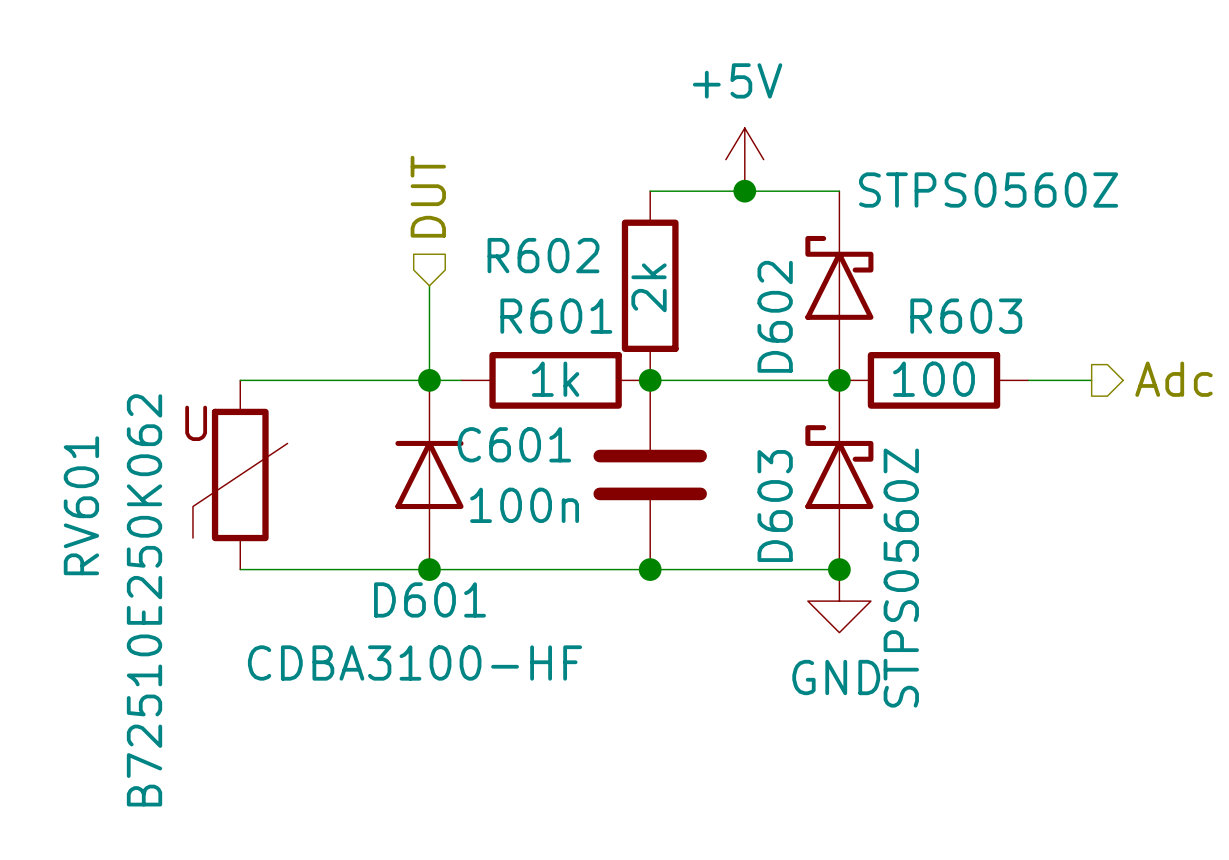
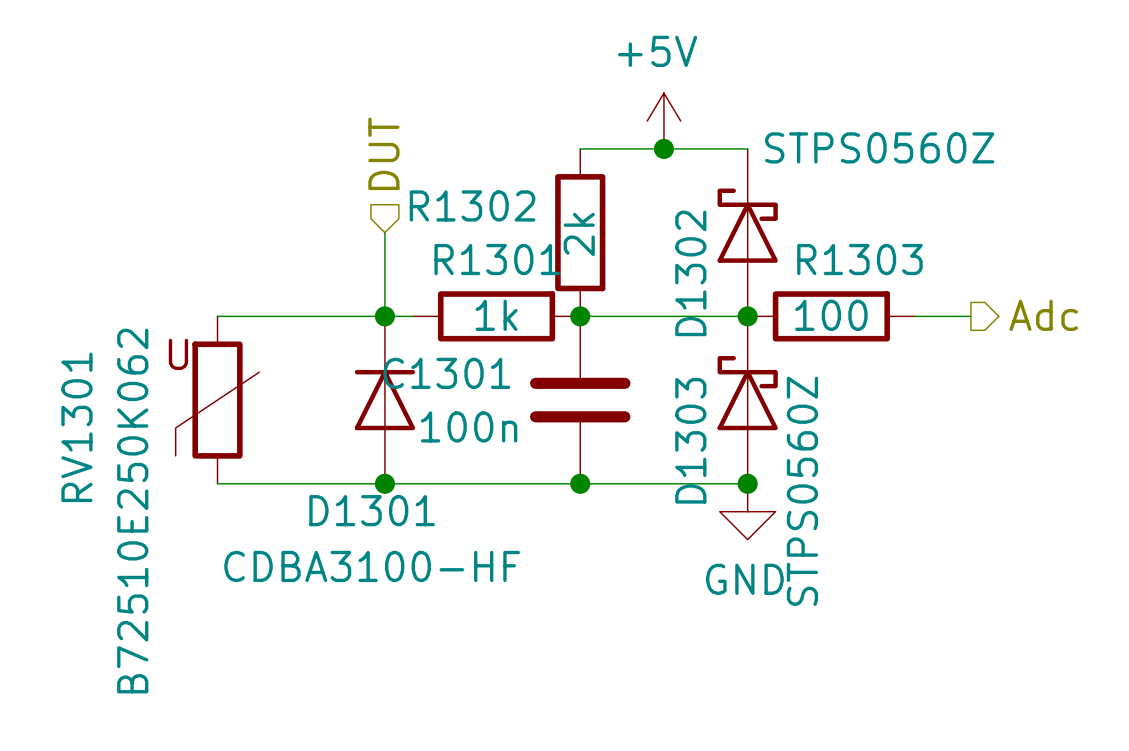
R602 name: R602 (543, 255) -> R1302 (472, 205)
R601 name: R601 (556, 316) -> R1301 (497, 259)
D602 name: D602 (775, 316) -> D1302 (690, 273)
R603 name: R603 (966, 316) -> R1303 (859, 259)
C601 name: C601 (514, 444) -> C1301 (446, 373)
RV601 name: RV601 (81, 505) -> RV1301 (76, 427)
D603 name: D603 (775, 506) -> D1303 (690, 440)
D601 name: D601 (429, 599) -> D1301 (372, 510)

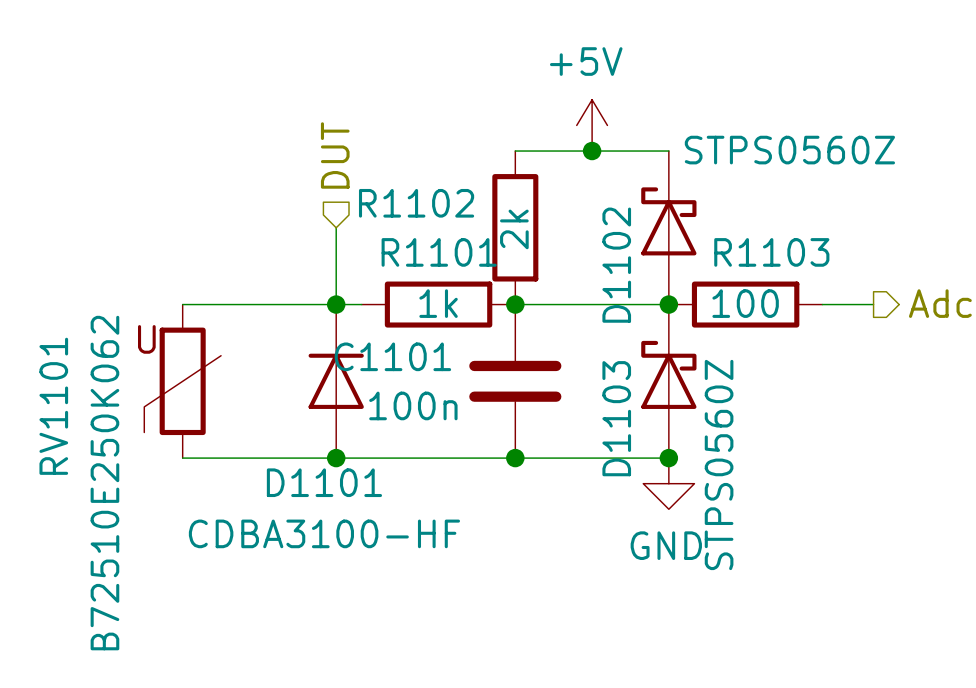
R1302 name: R1302 (472, 205) -> R1102 (416, 203)
R1301 name: R1301 (497, 259) -> R1101 (439, 252)
R1303 name: R1303 (859, 259) -> R1103 (771, 252)
D1302 name: D1302 (690, 273) -> D1102 (616, 265)
C1301 name: C1301 (446, 373) -> C1101 (392, 356)
RV1301 name: RV1301 (76, 427) -> RV1101 (53, 406)
D1303 name: D1303 (690, 440) -> D1103 (616, 418)
D1301 name: D1301 (372, 510) -> D1101 (324, 482)

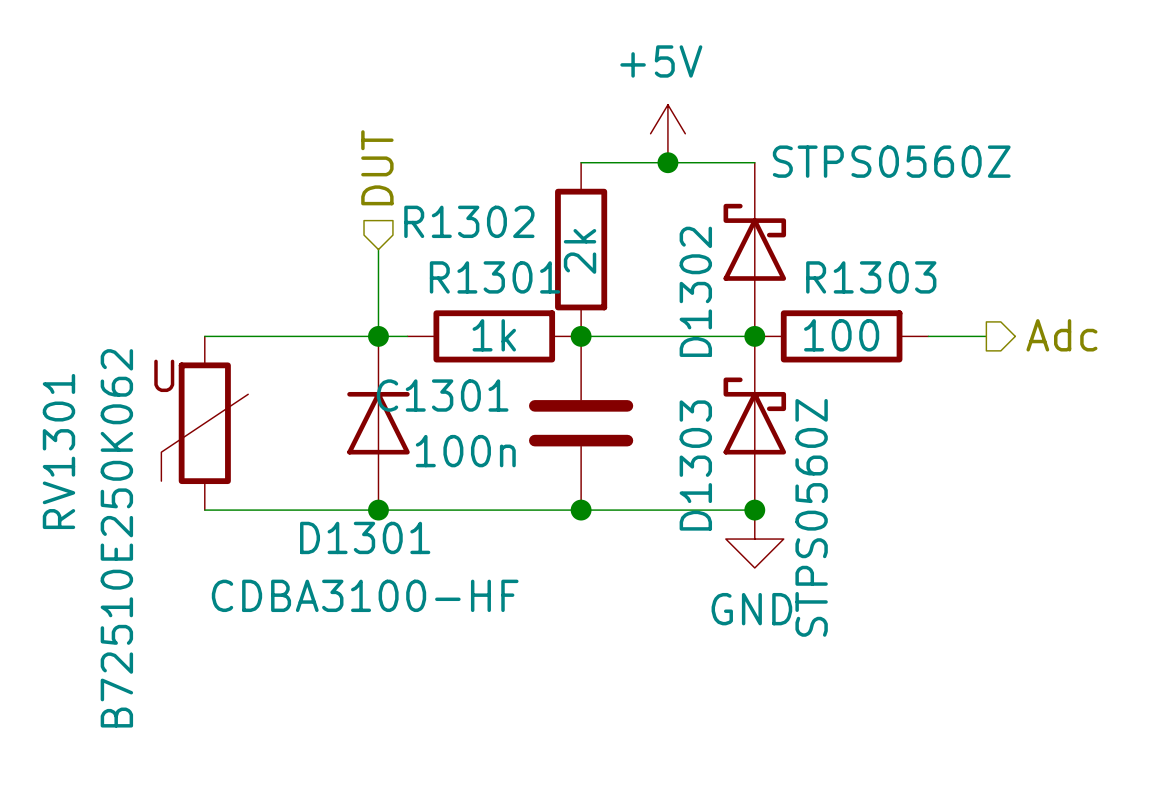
R1102 name: R1102 (416, 203) -> R1302 (469, 221)
R1101 name: R1101 (439, 252) -> R1301 (494, 277)
R1103 name: R1103 (771, 252) -> R1303 (871, 277)
D1102 name: D1102 (616, 265) -> D1302 (695, 291)
C1101 name: C1101 (392, 356) -> C1301 (442, 395)
RV1101 name: RV1101 (53, 406) -> RV1301 (58, 451)
D1103 name: D1103 (616, 418) -> D1303 (695, 465)
D1101 name: D1101 (324, 482) -> D1301 (365, 537)

